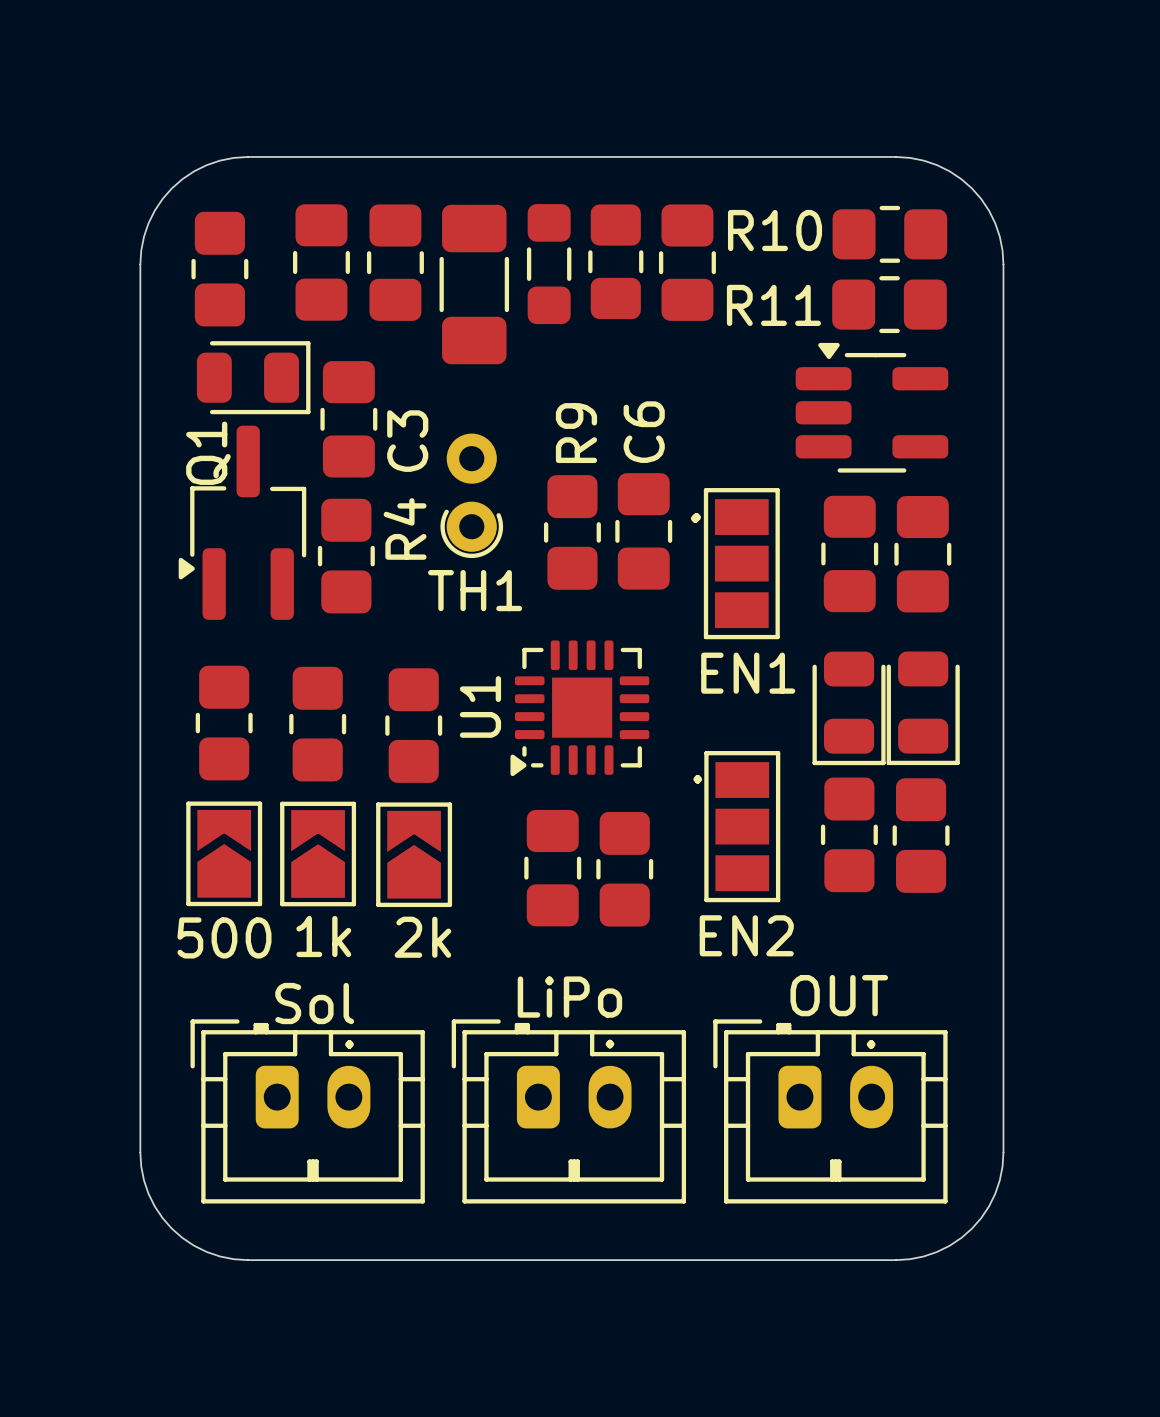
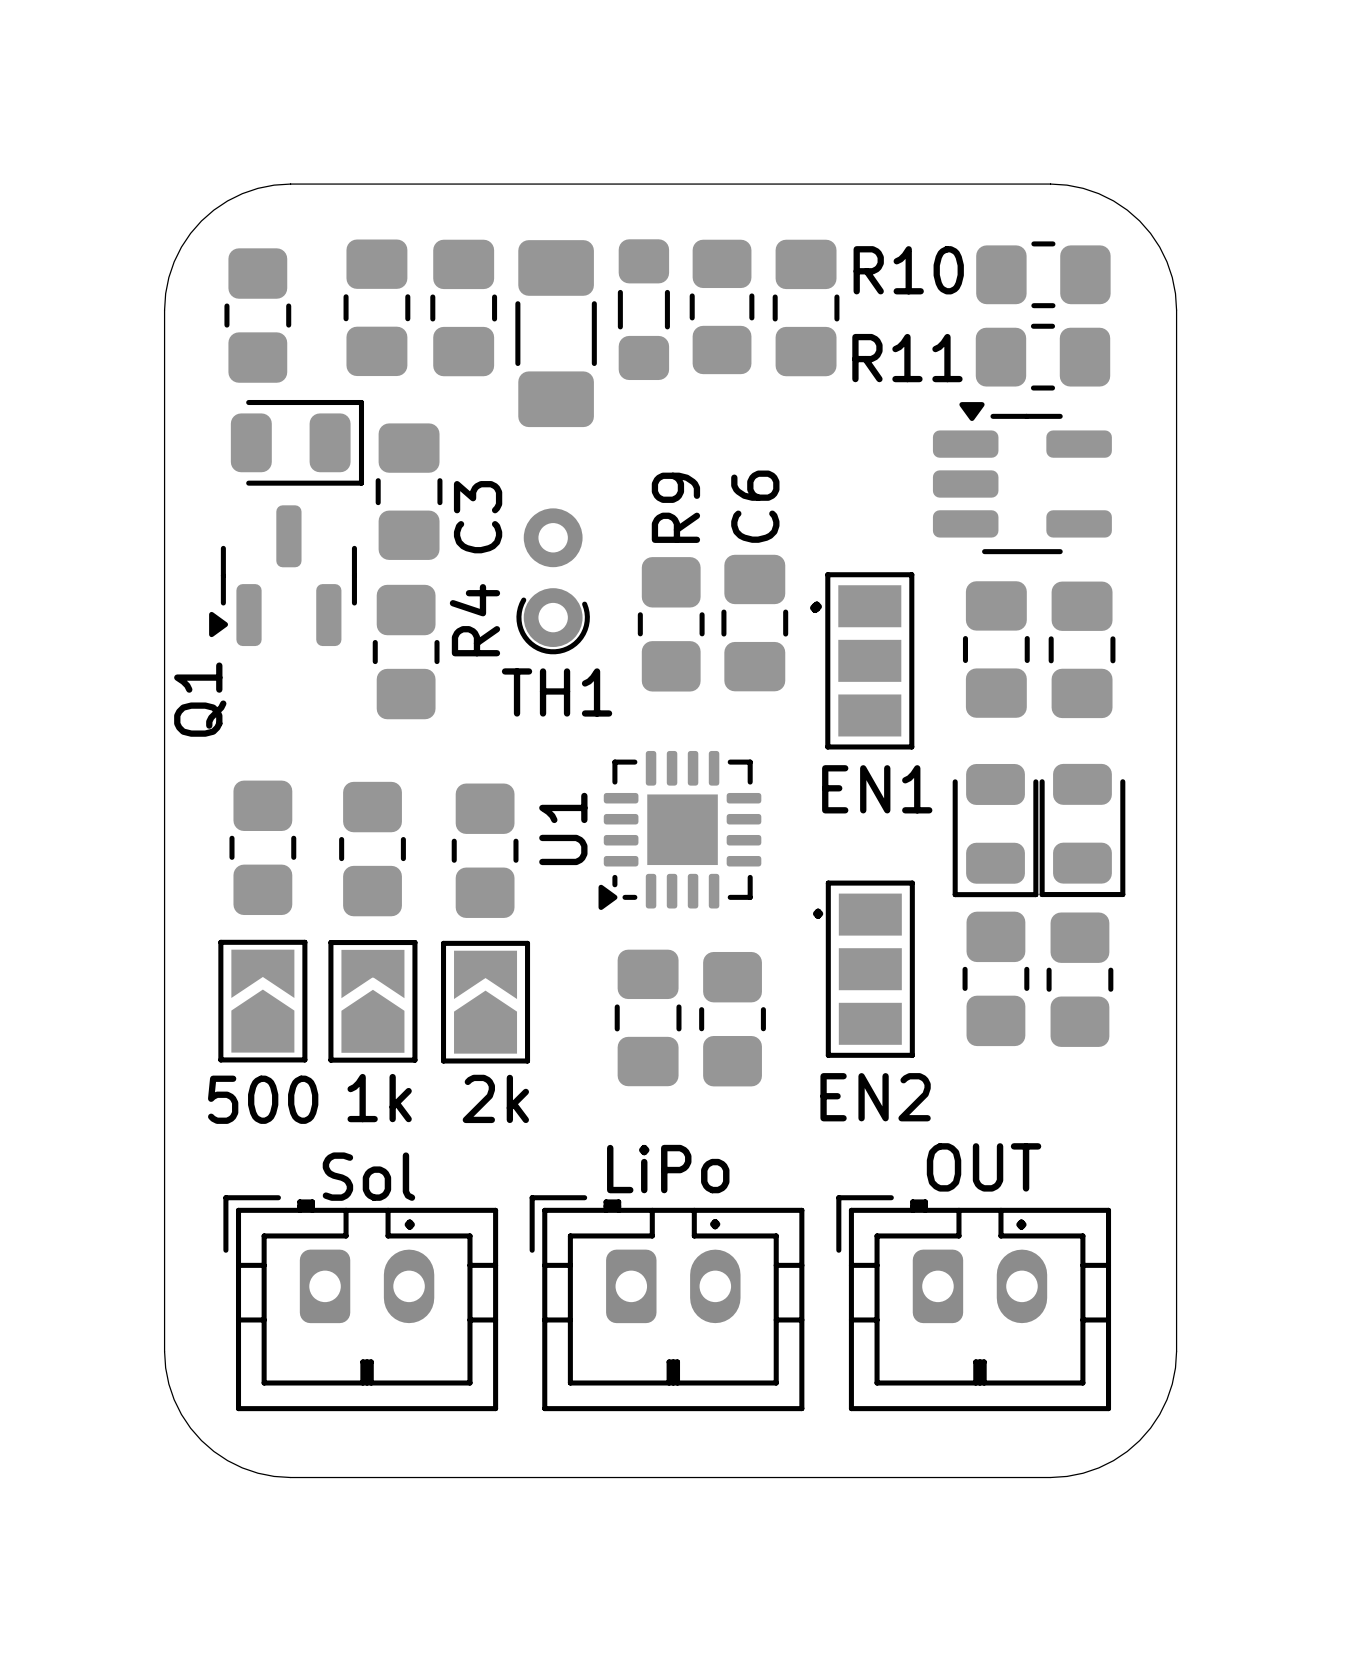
Q1 footprint: [178, 425, 307, 620] -> [209, 505, 357, 647]
Q1 name position: Q1 (208, 453) -> Q1 (200, 699)

